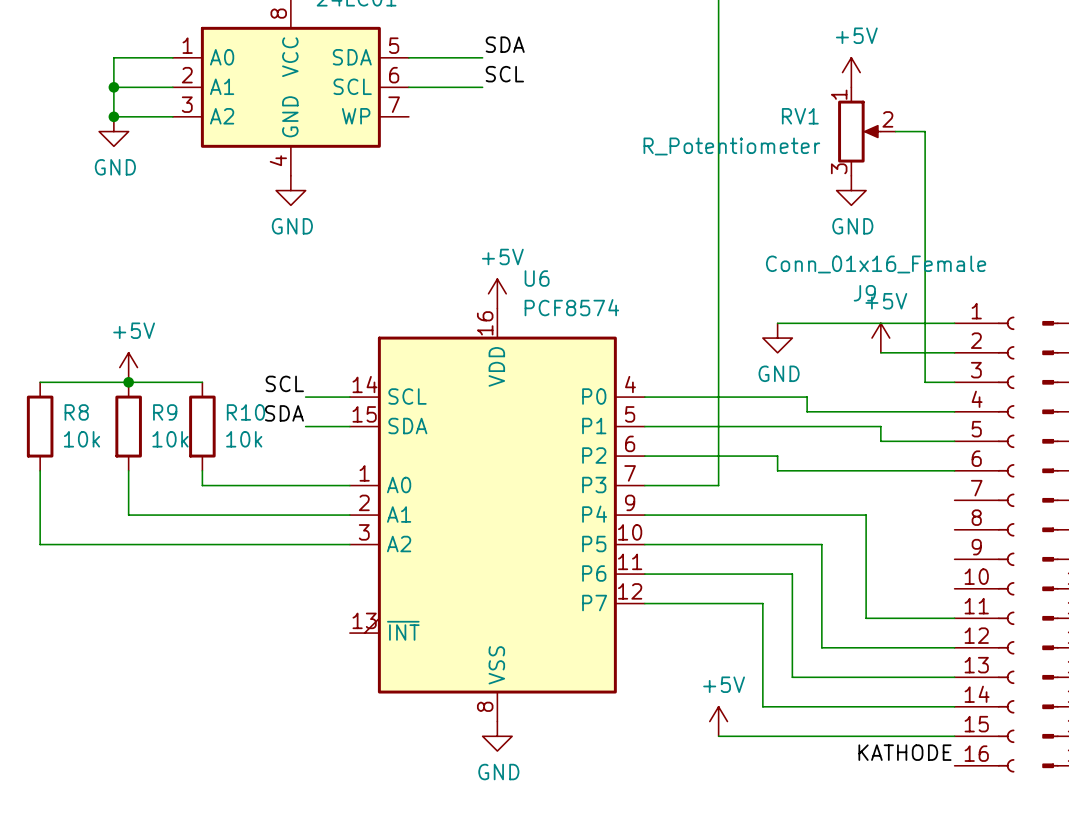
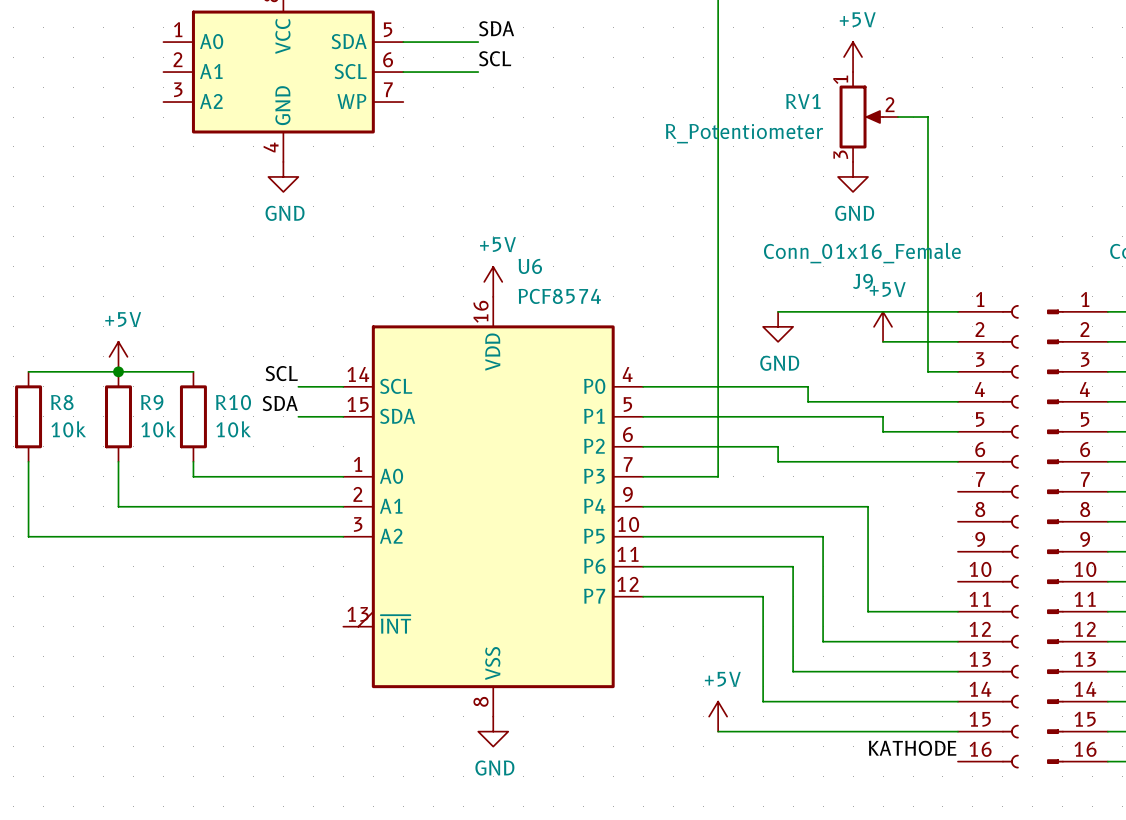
wire: (172, 57) (113, 57) (113, 116) (172, 116) -> none
wire: (113, 87) (172, 87) -> none
junction: (113, 87) -> none
junction: (113, 116) -> none
power symbol: GND (113, 131) -> none

